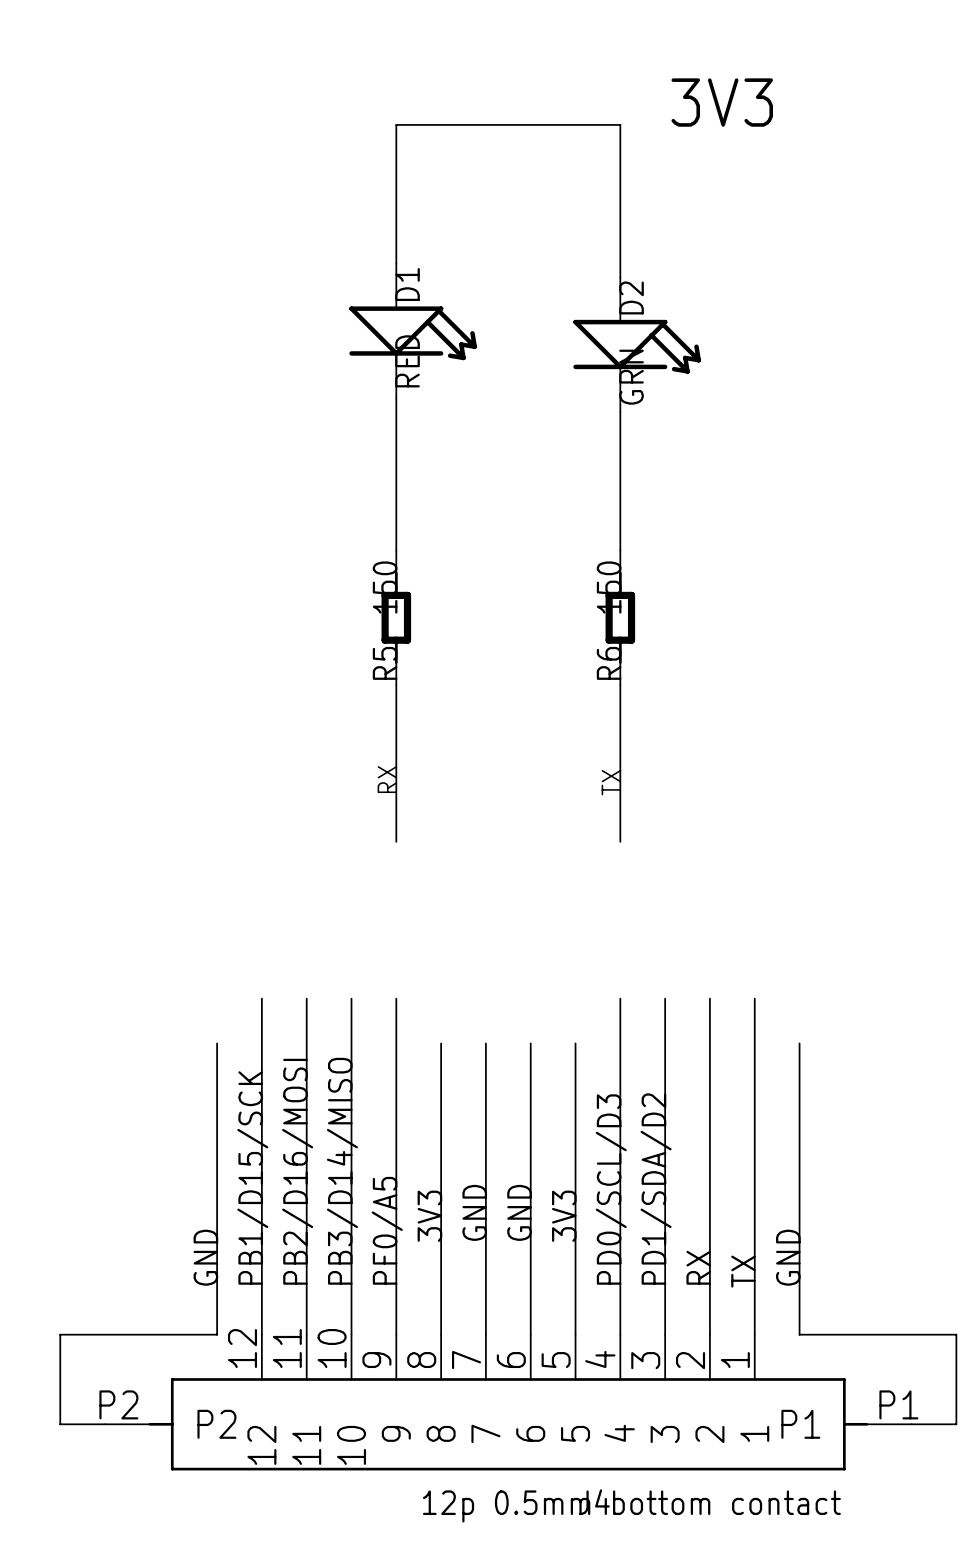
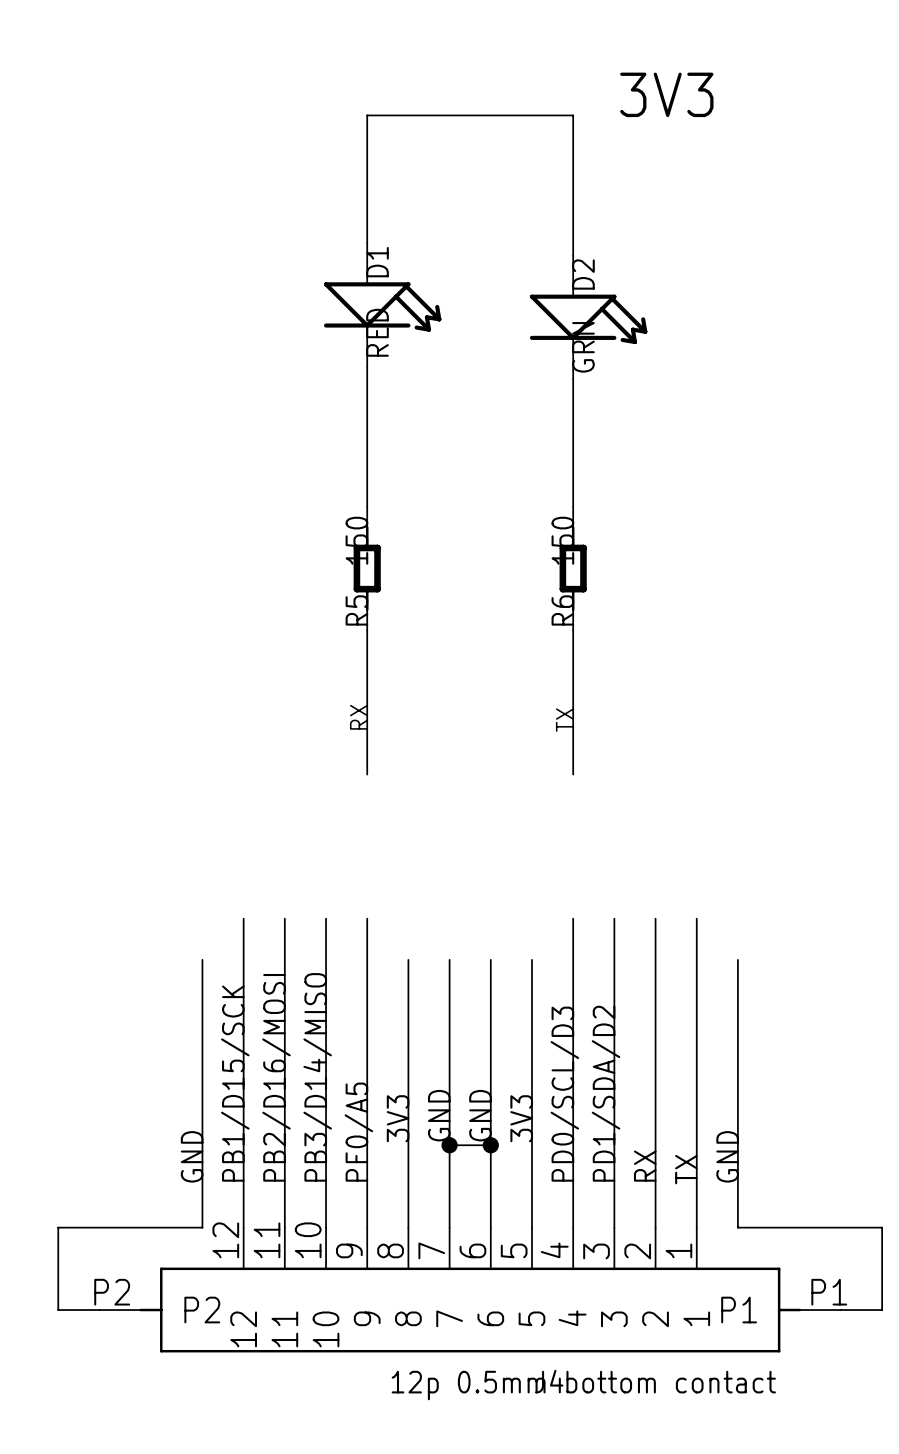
wire: none -> (449, 1145) (490, 1145)
junction: none -> (449, 1145)
junction: none -> (490, 1145)

